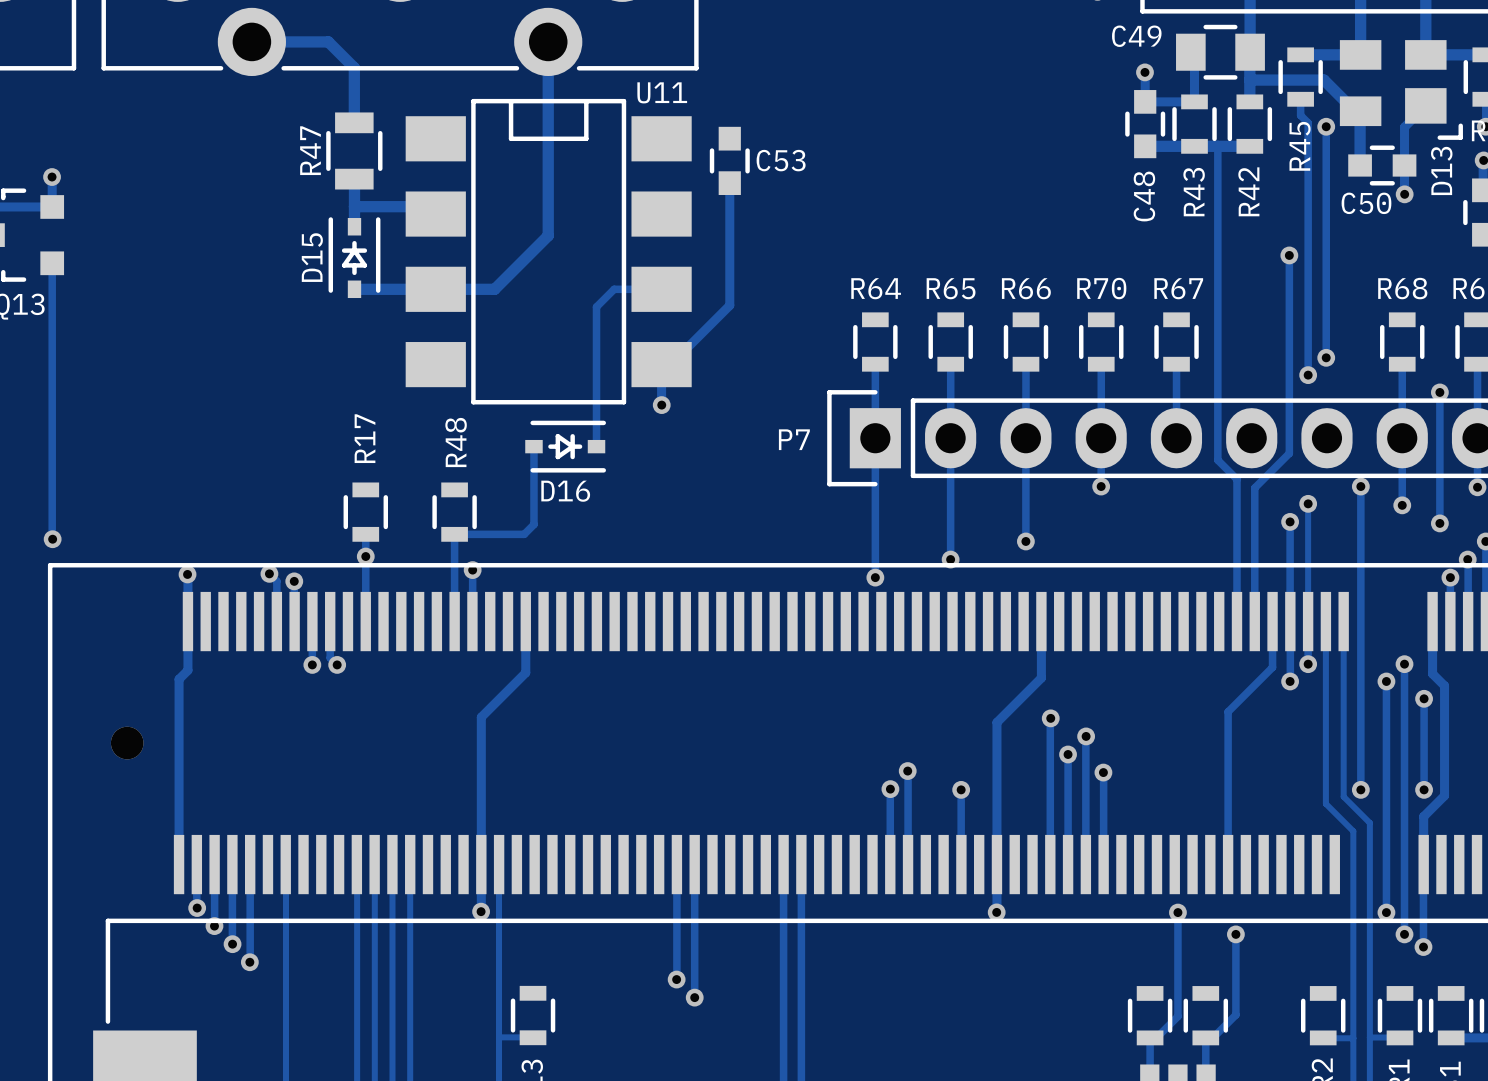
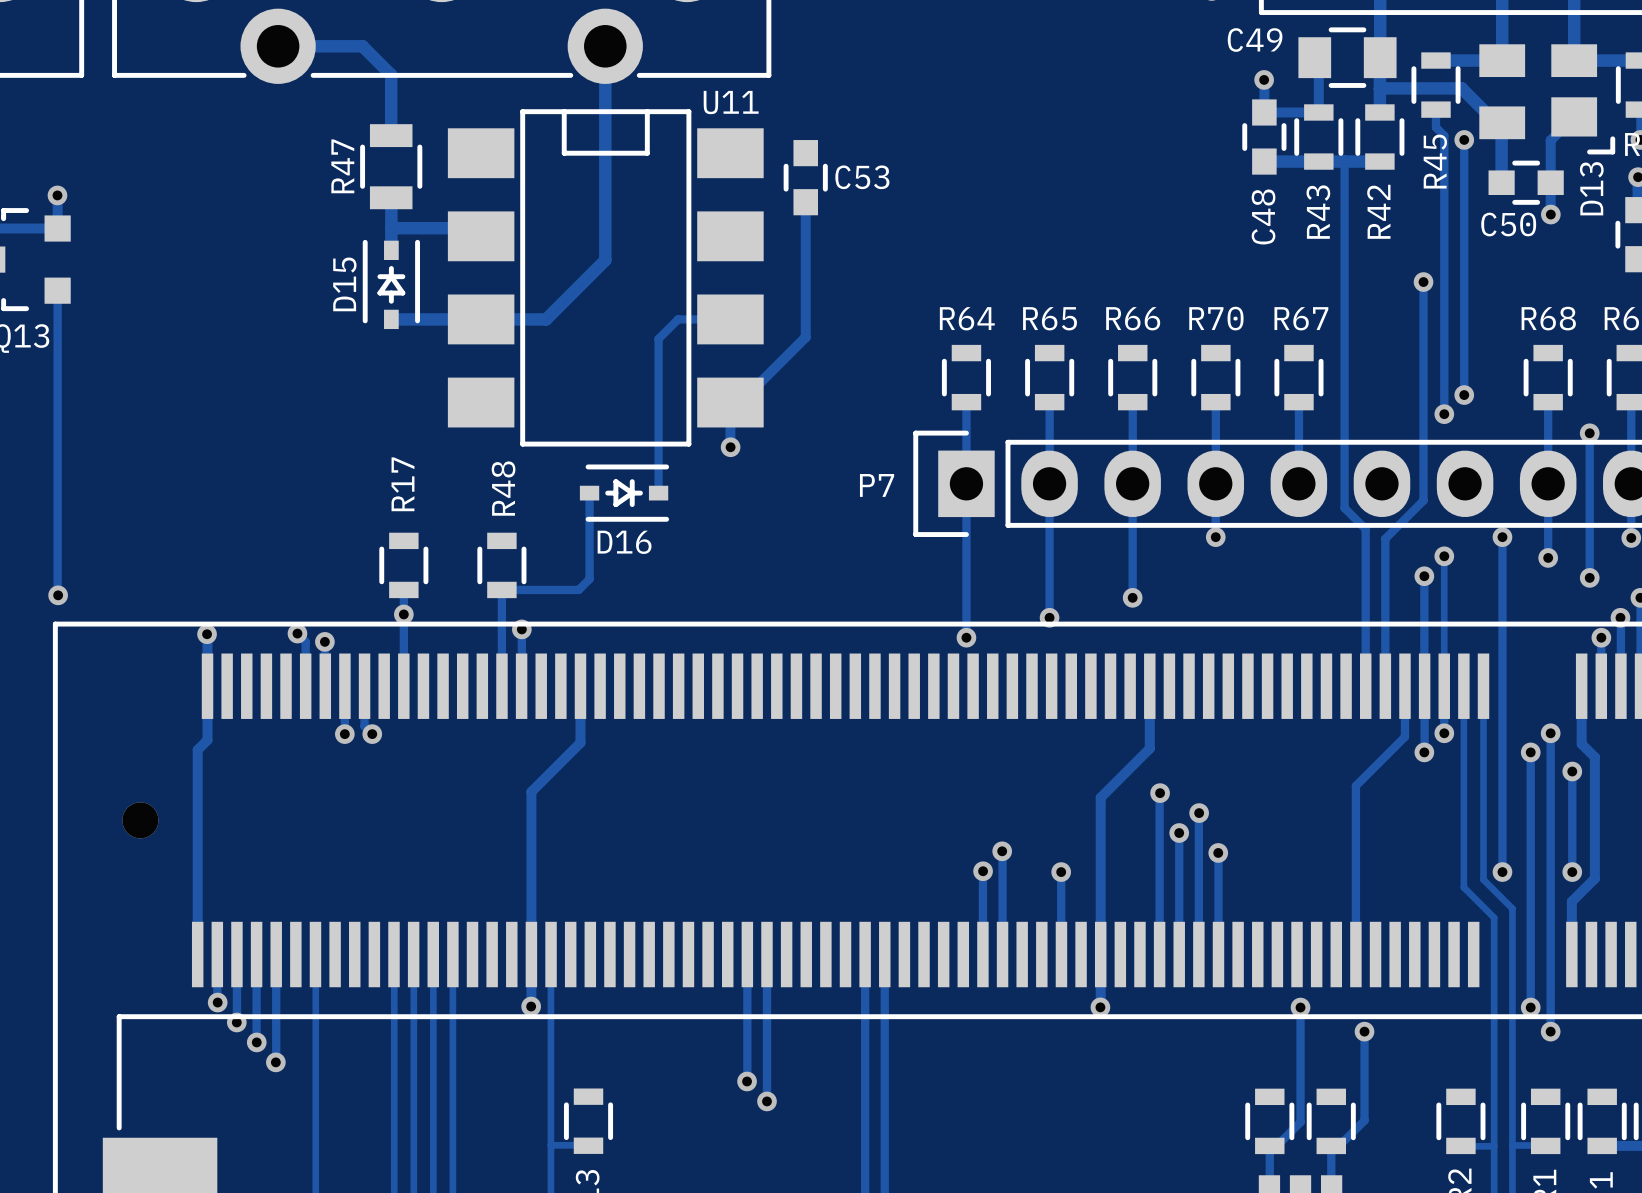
track: (1423, 864) (1423, 947) -> none
via: (1423, 947) -> none

